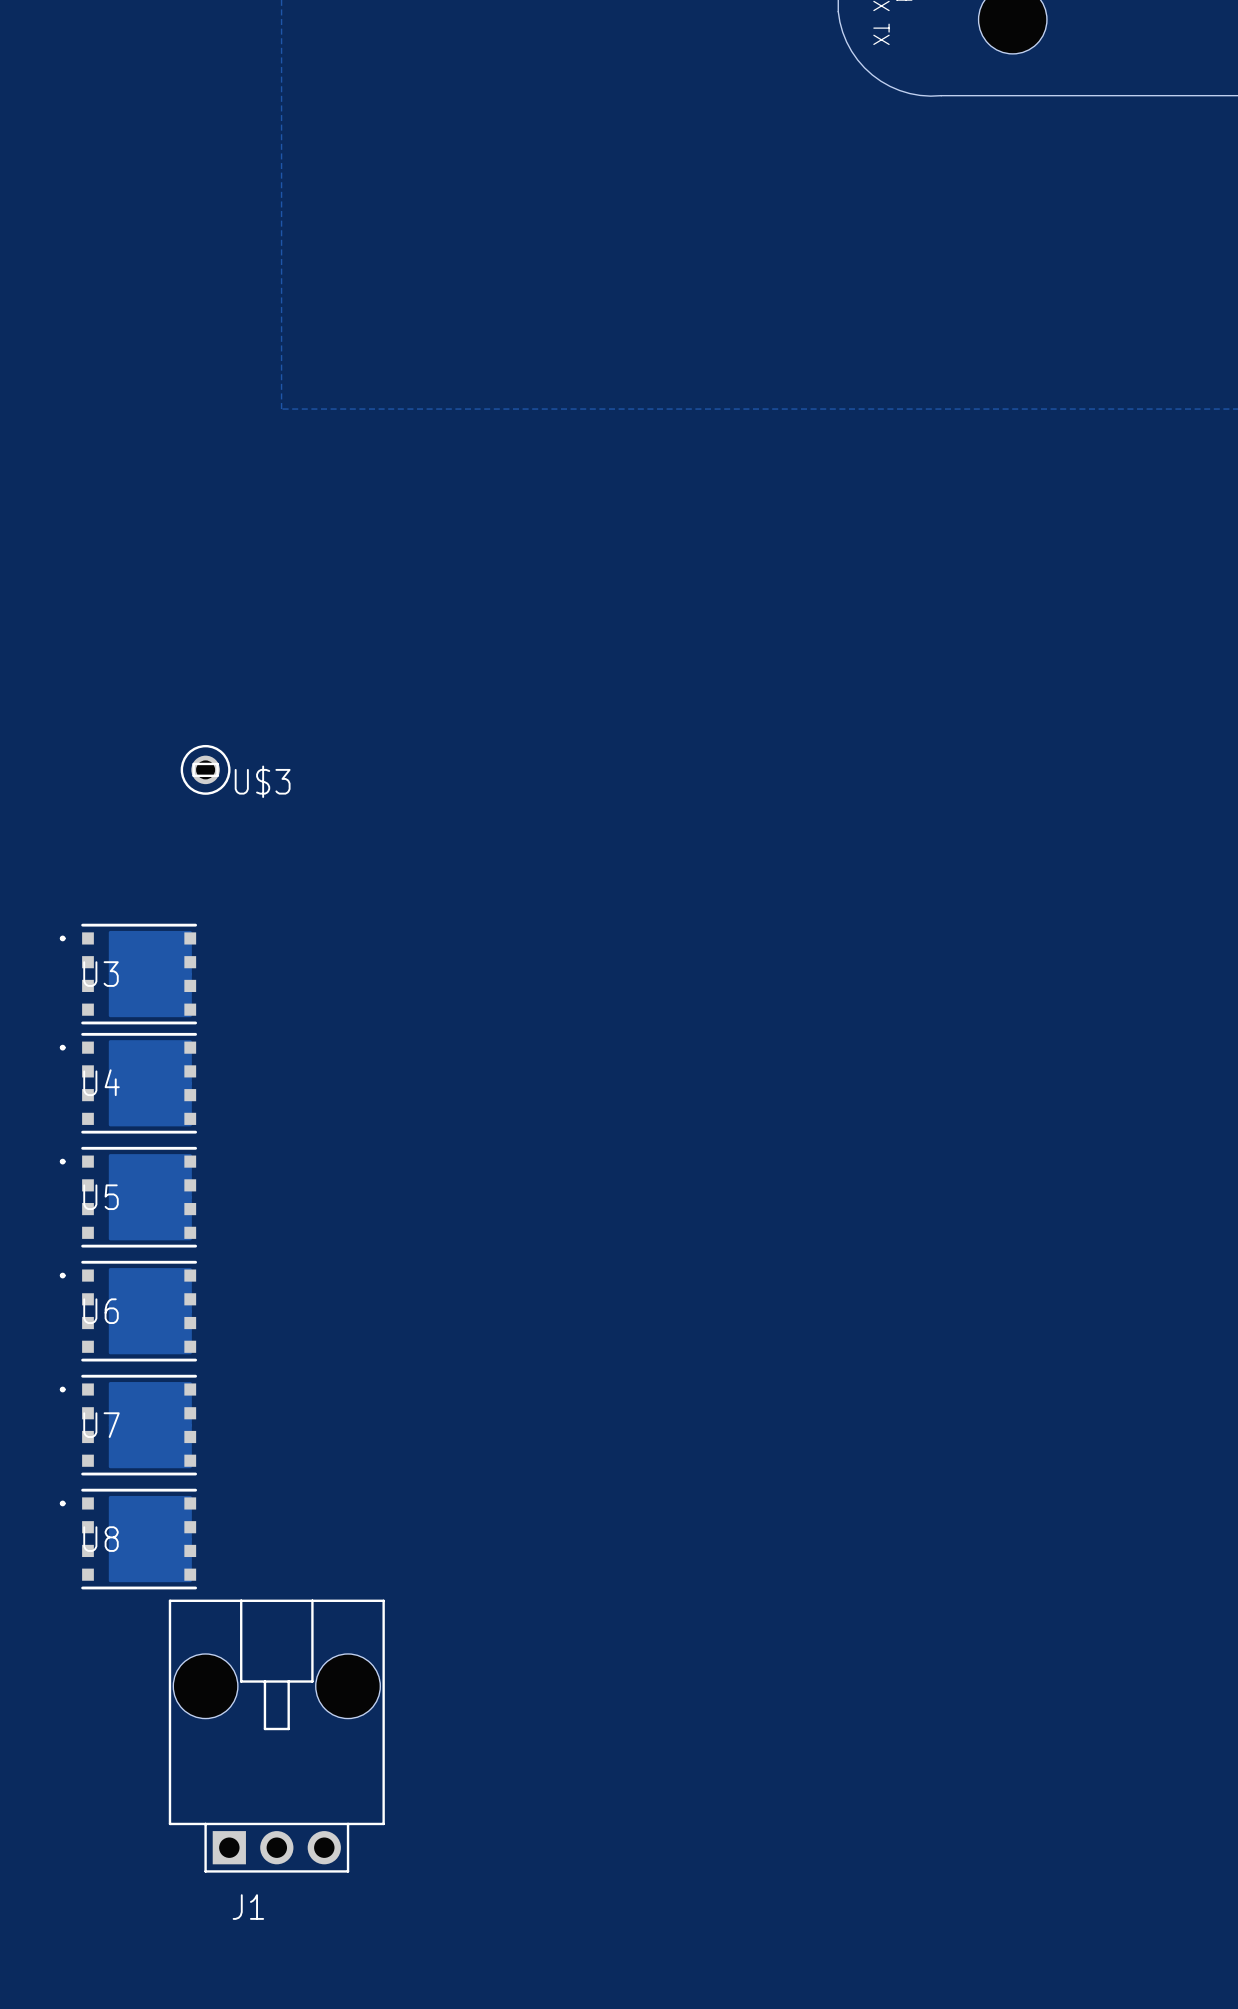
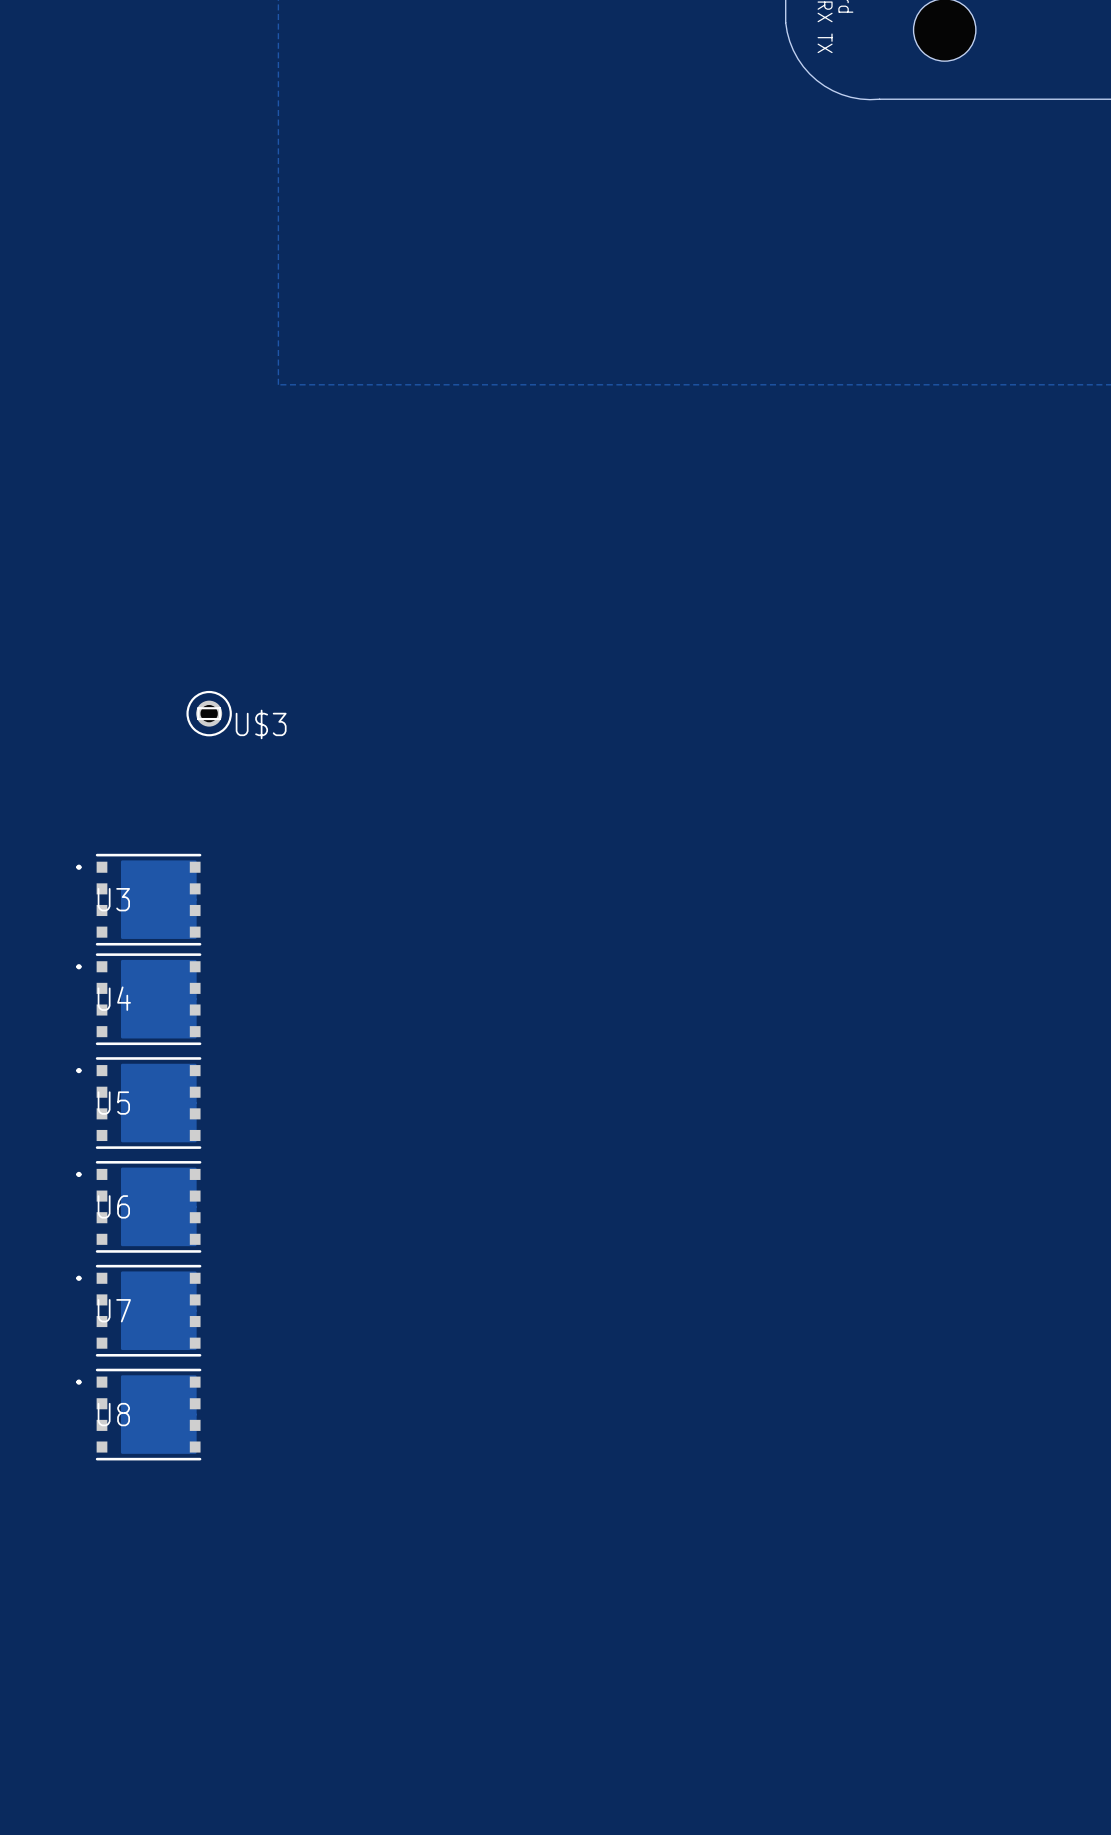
J1: (276, 1736) -> none

